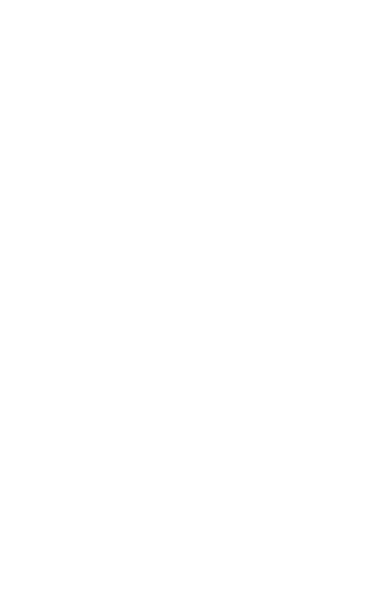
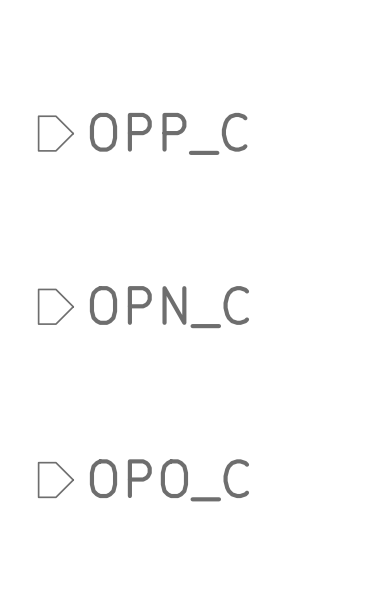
hierarchical label: none -> OPP_C (168, 133)
hierarchical label: none -> OPN_C (169, 307)
hierarchical label: none -> OPO_C (169, 480)

